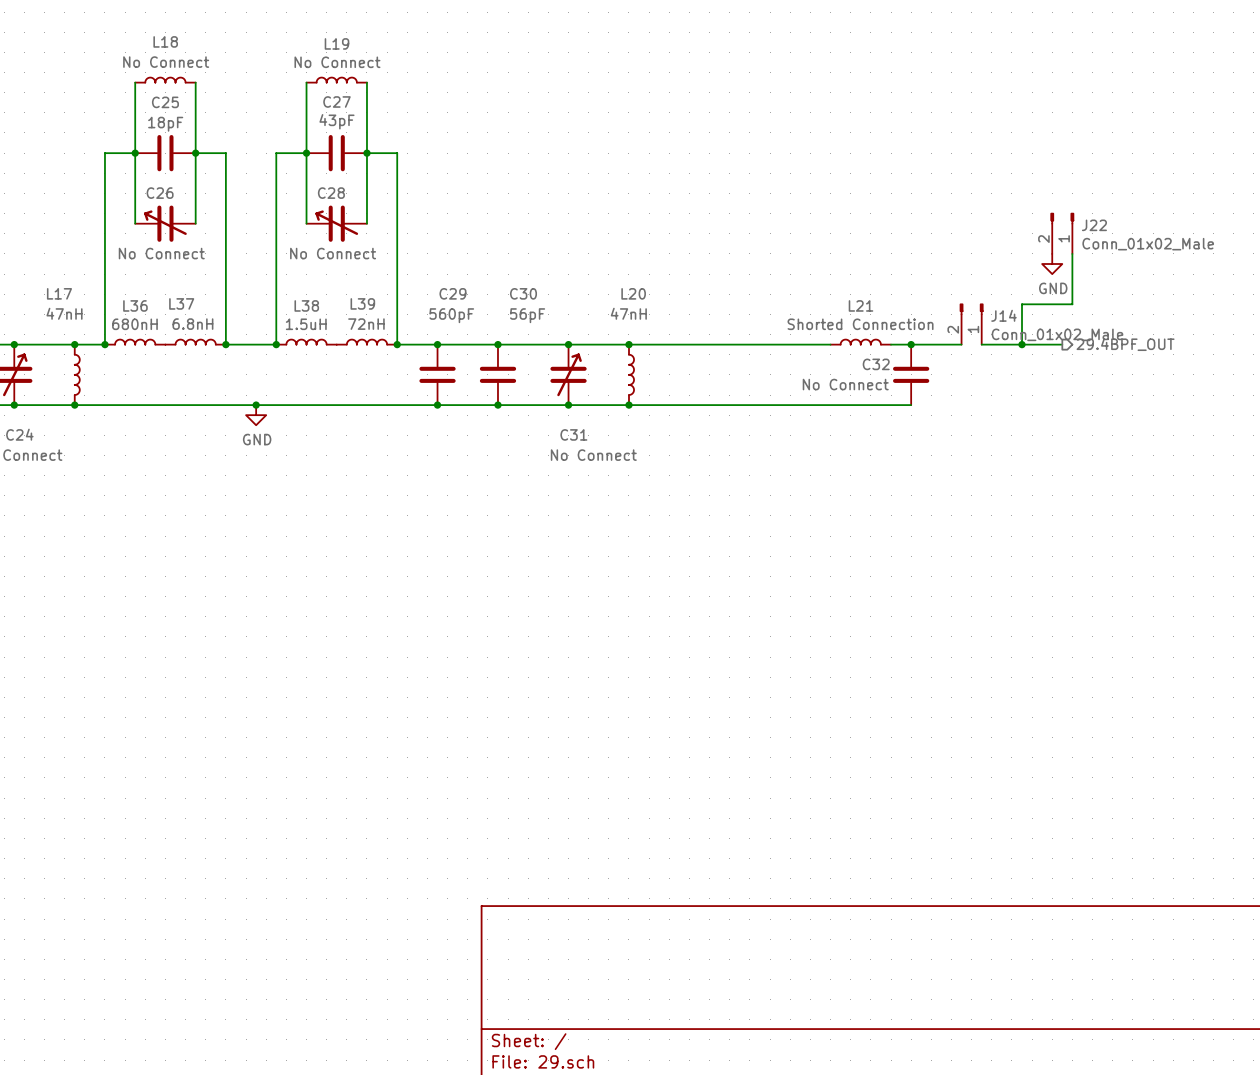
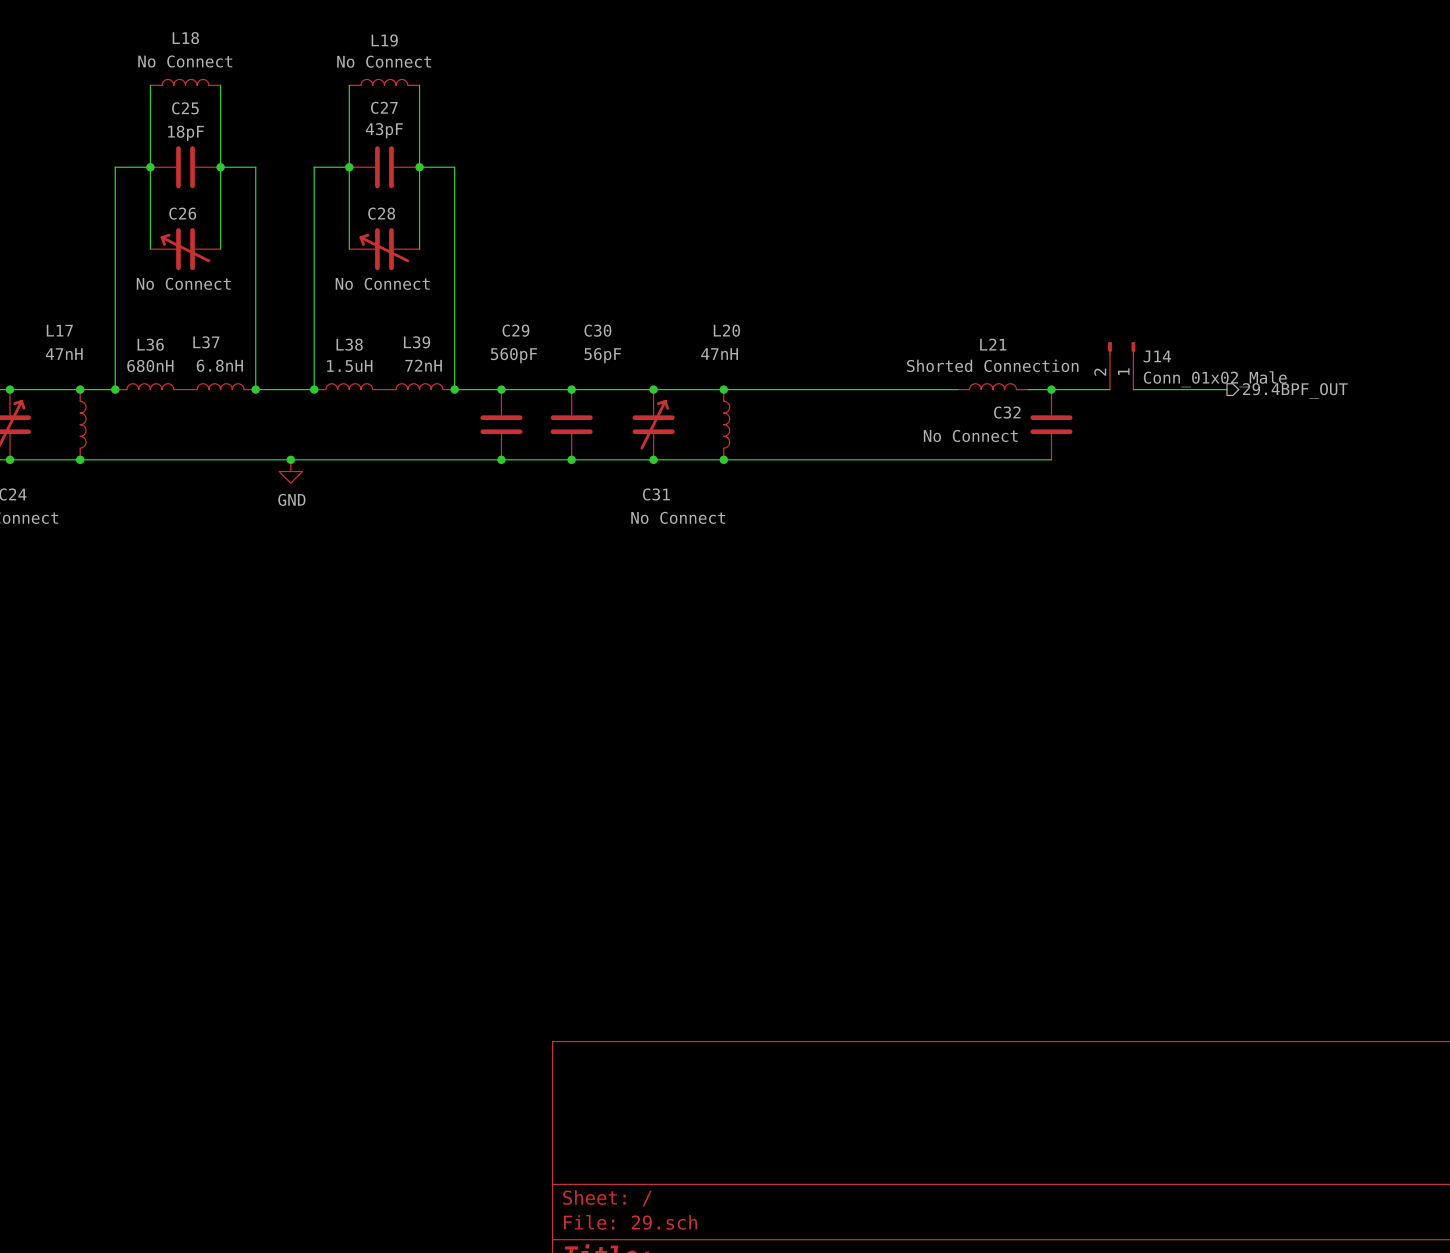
J22: Conn_01x02_Male (1062, 233) -> none
wire: (1072, 253) (1072, 304) (1022, 304) (1022, 344) -> none
power symbol: GND (1052, 264) -> none
junction: (1022, 344) -> none

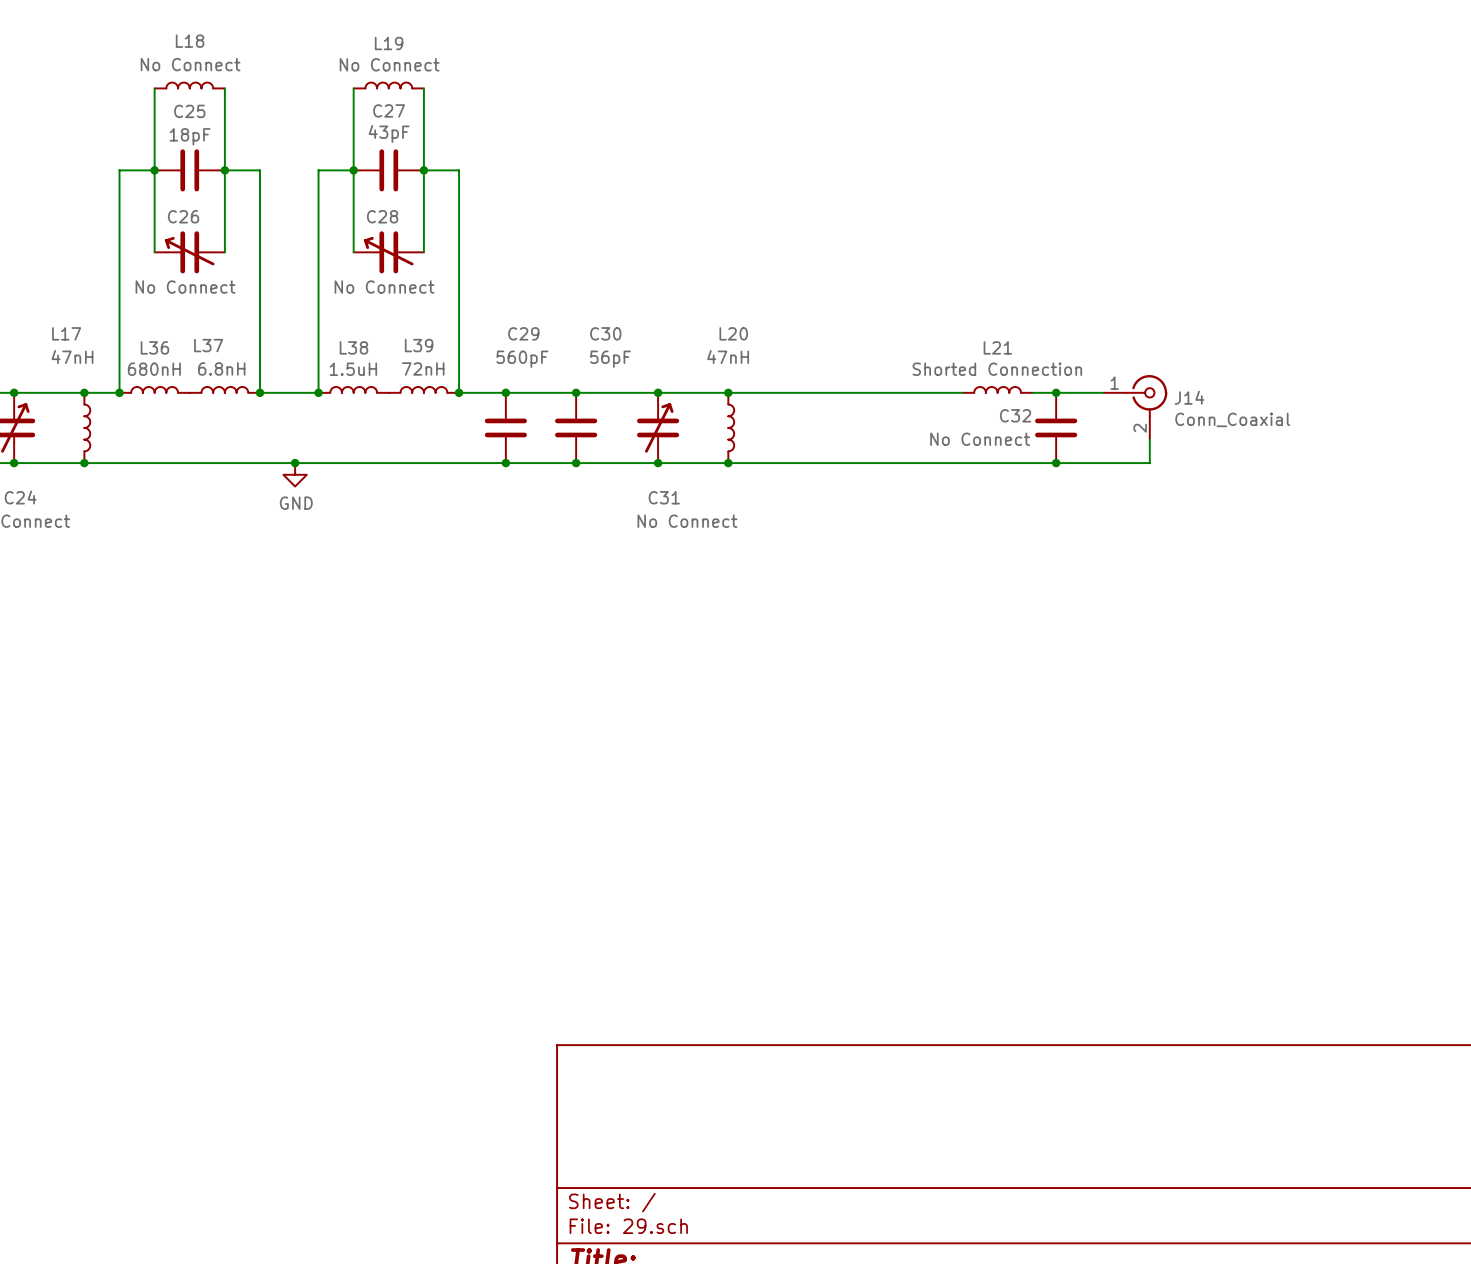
J14 symbol: [1108, 342, 1136, 390] -> [1102, 375, 1168, 440]
J14 value: Conn_01x02_Male (1215, 379) -> Conn_Coaxial (1232, 419)
wire: (1133, 389) (1226, 389) -> none
hierarchical label: 29.4BPF_OUT (1295, 390) -> none
wire: none -> (1149, 439) (1149, 463) (1056, 463)
junction: none -> (1056, 463)

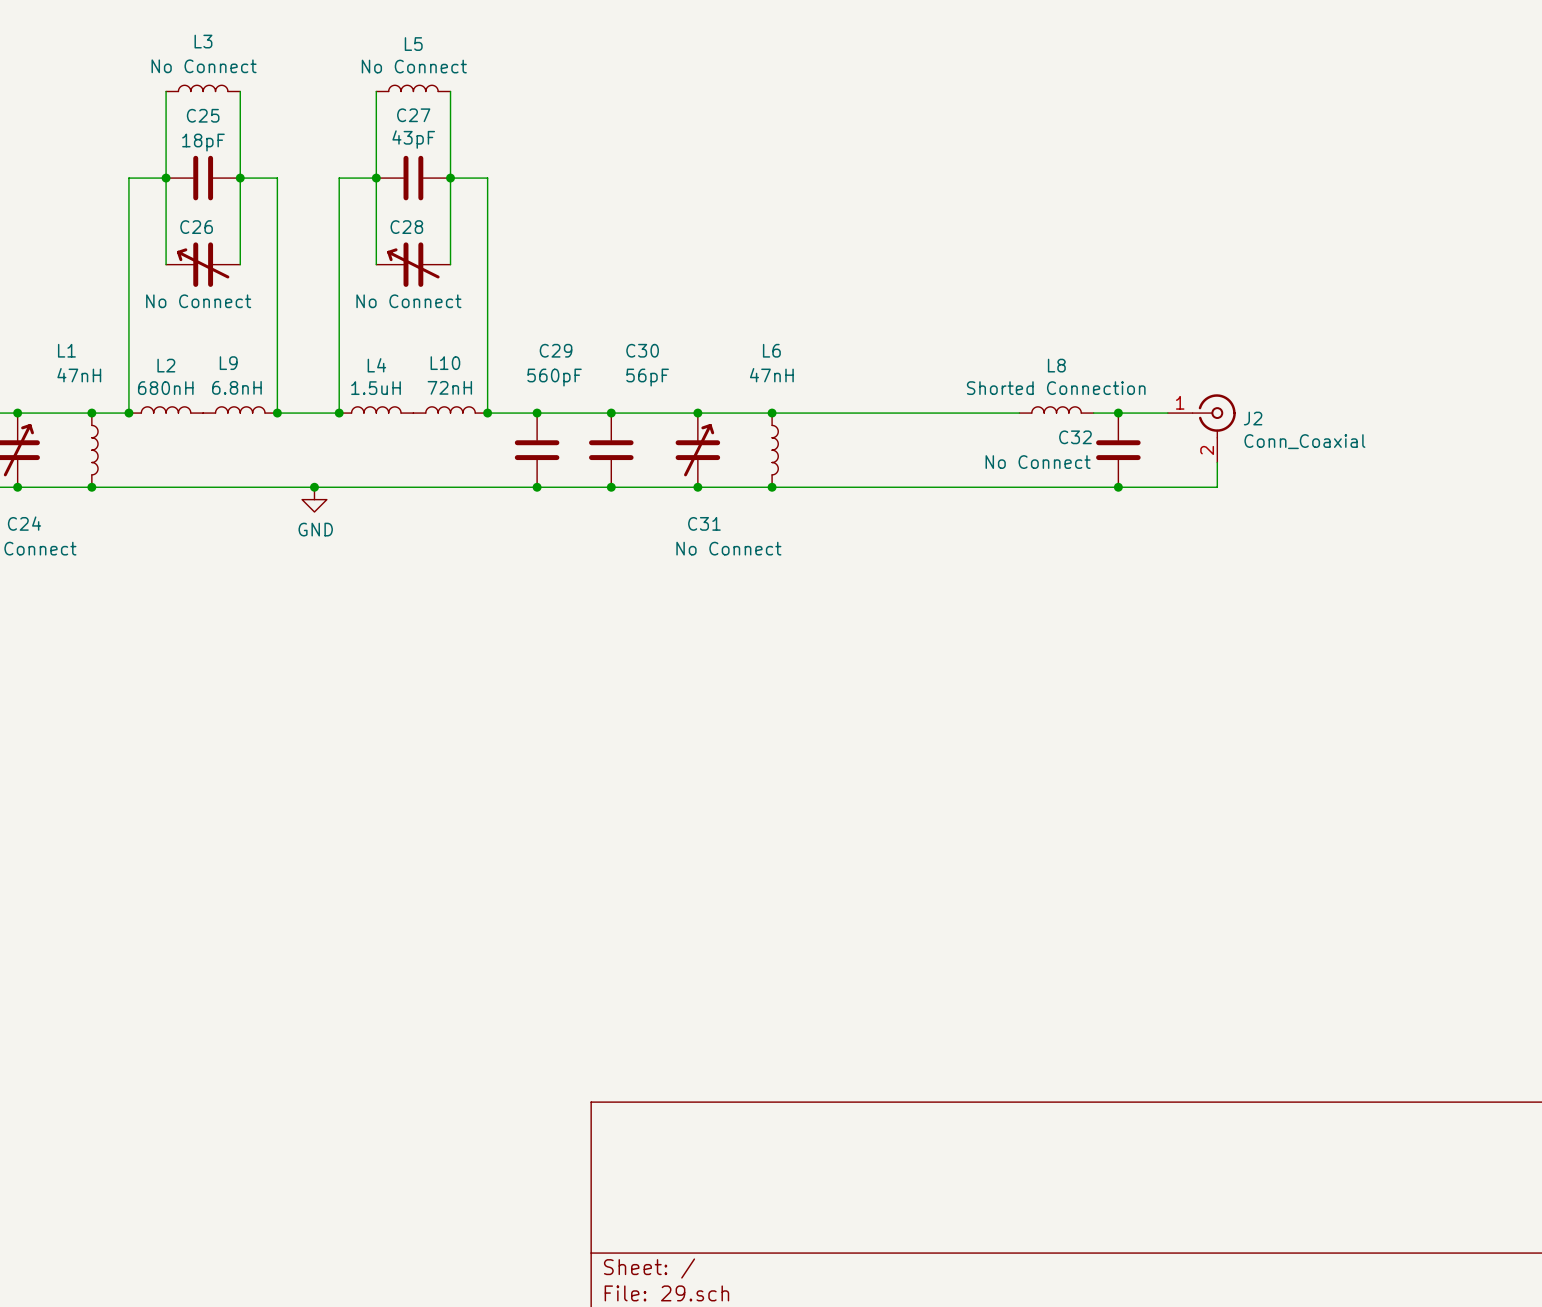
L18 name: L18 (190, 41) -> L3 (203, 41)
L19 name: L19 (389, 43) -> L5 (413, 44)
L17 name: L17 (66, 333) -> L1 (66, 350)
L20 name: L20 (733, 333) -> L6 (771, 350)
L37 name: L37 (208, 345) -> L9 (228, 363)
L39 name: L39 (419, 345) -> L10 (445, 363)
L36 name: L36 (154, 347) -> L2 (166, 365)
L38 name: L38 (353, 347) -> L4 (376, 365)
L21 name: L21 (997, 347) -> L8 (1056, 365)
J14 name: J14 (1189, 397) -> J2 (1253, 418)

